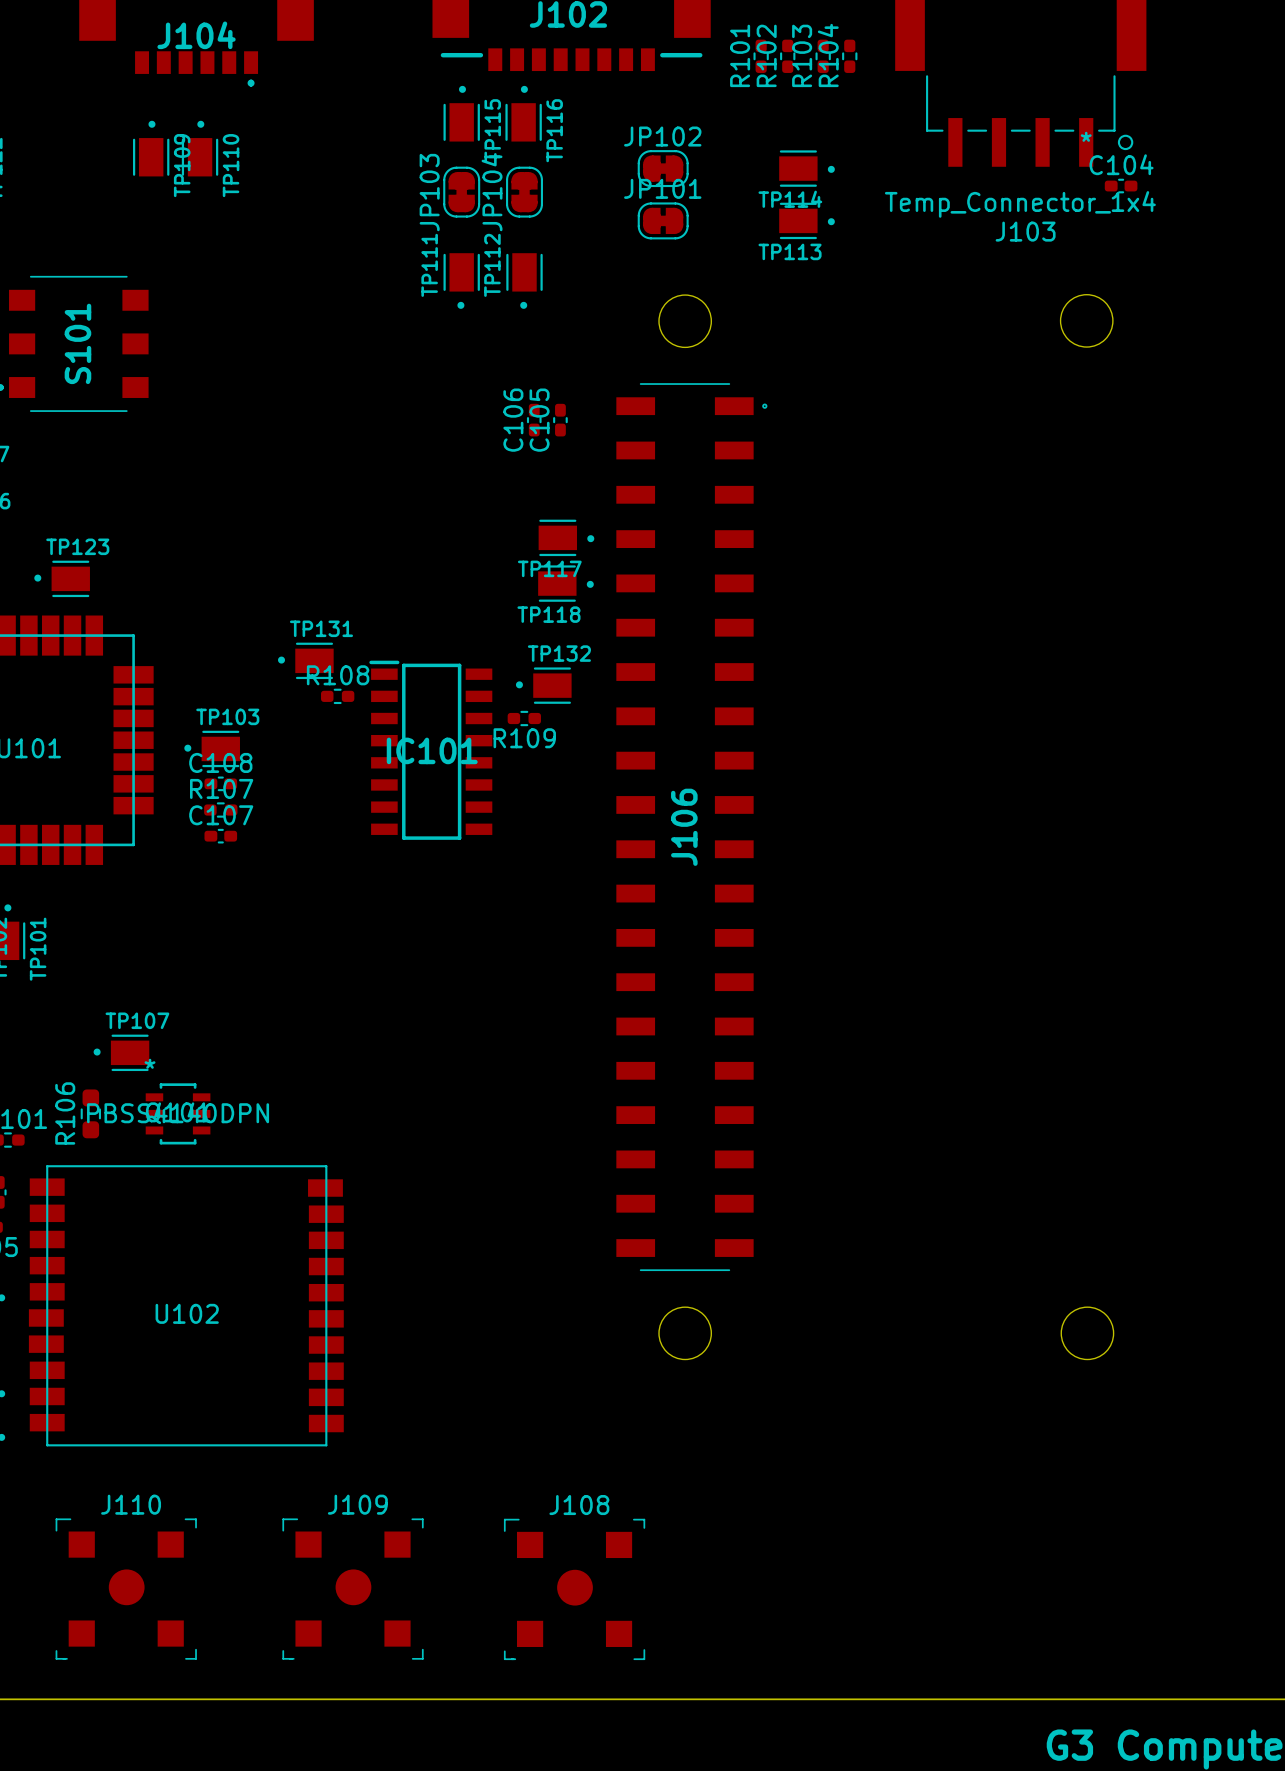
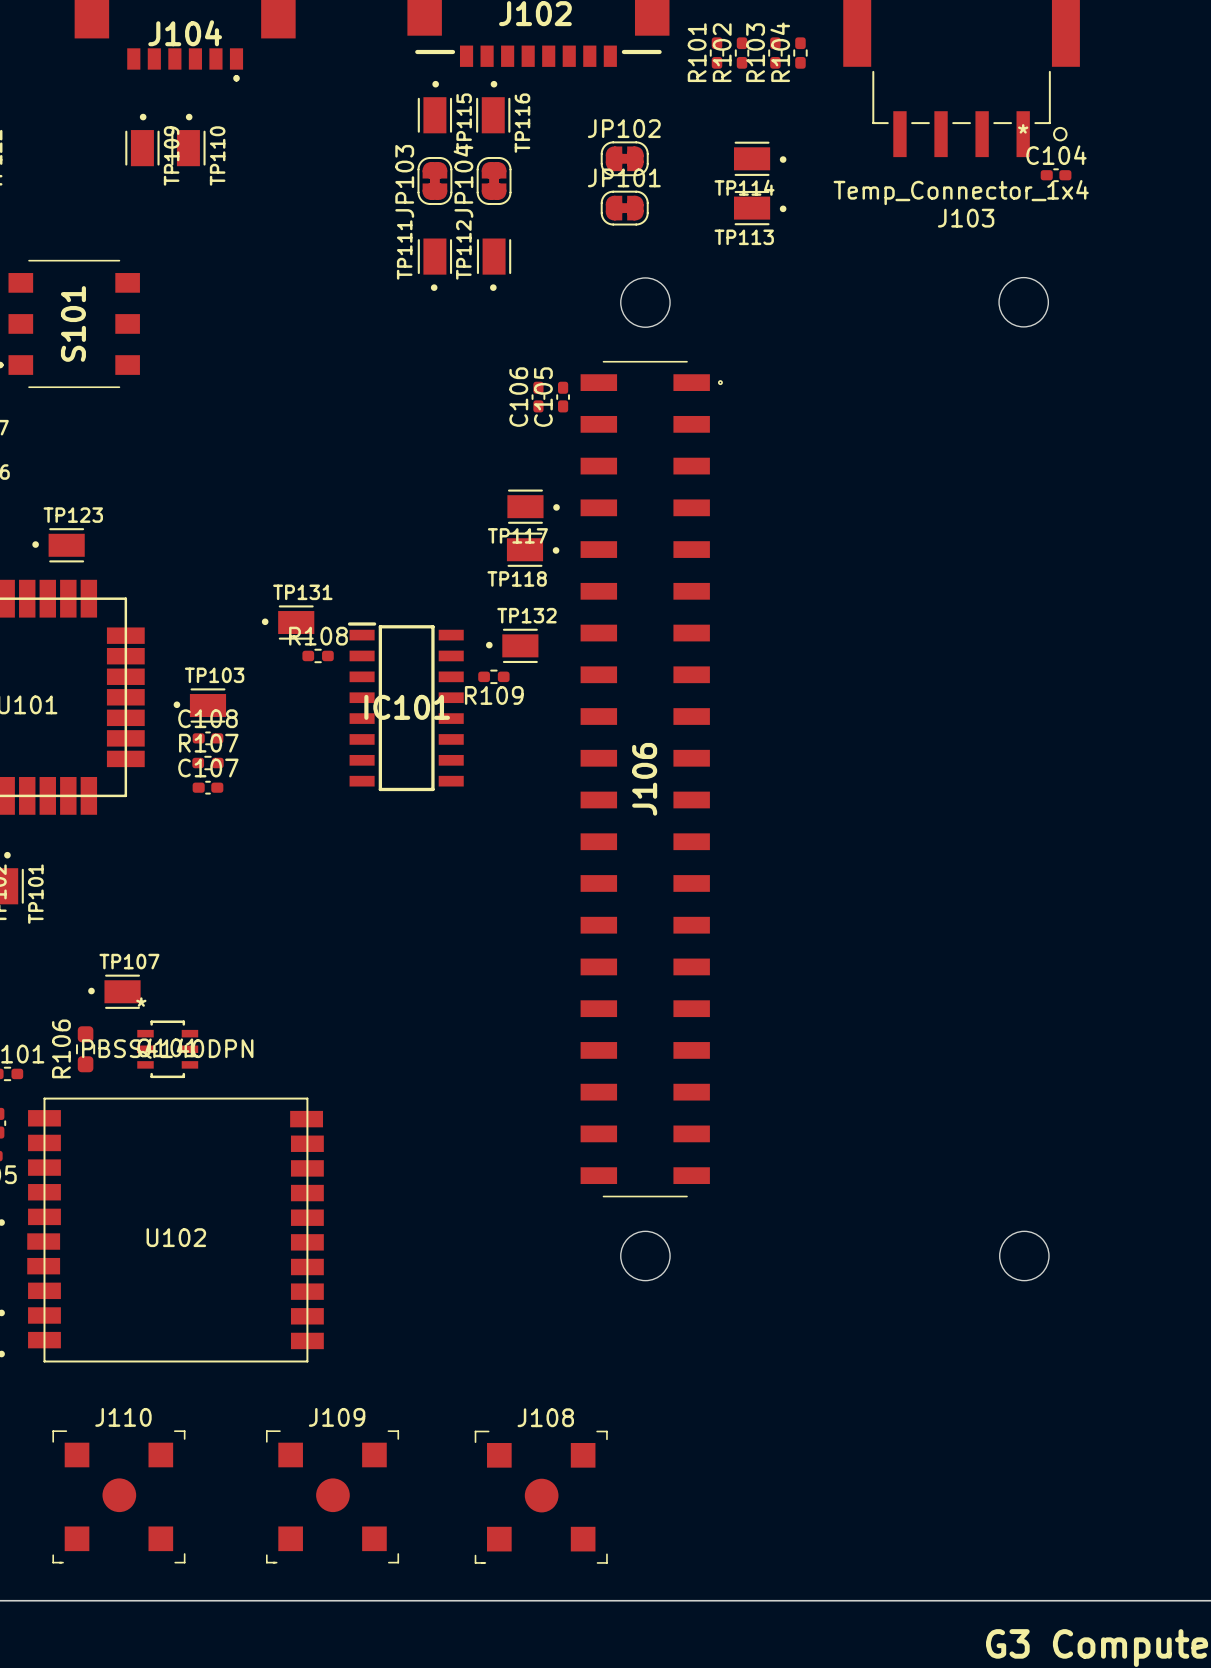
C106 position: (534, 420) -> (538, 397)
C105 position: (560, 420) -> (563, 397)

